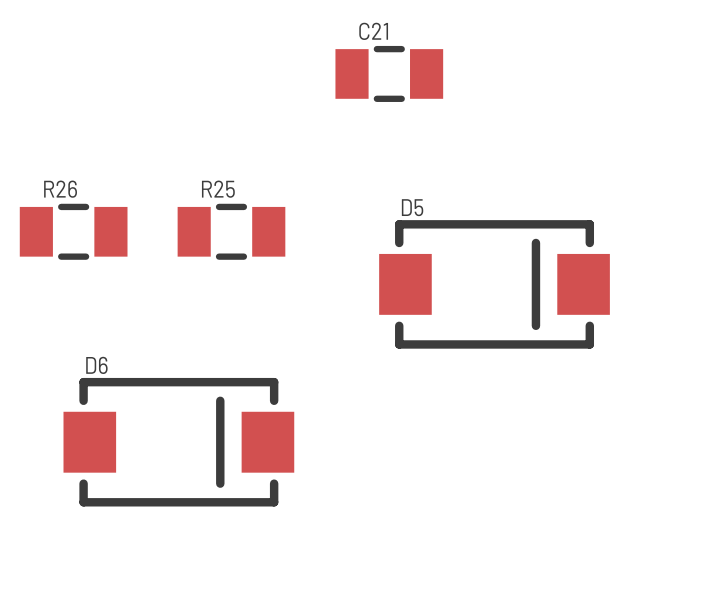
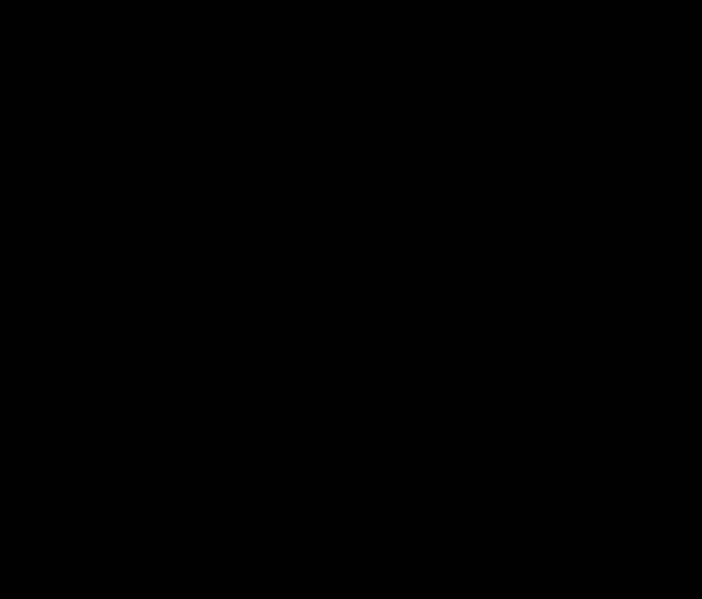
C21: (389, 73) -> none
R26: (73, 231) -> none
R25: (231, 231) -> none
D5: (494, 284) -> none
D6: (178, 442) -> none

